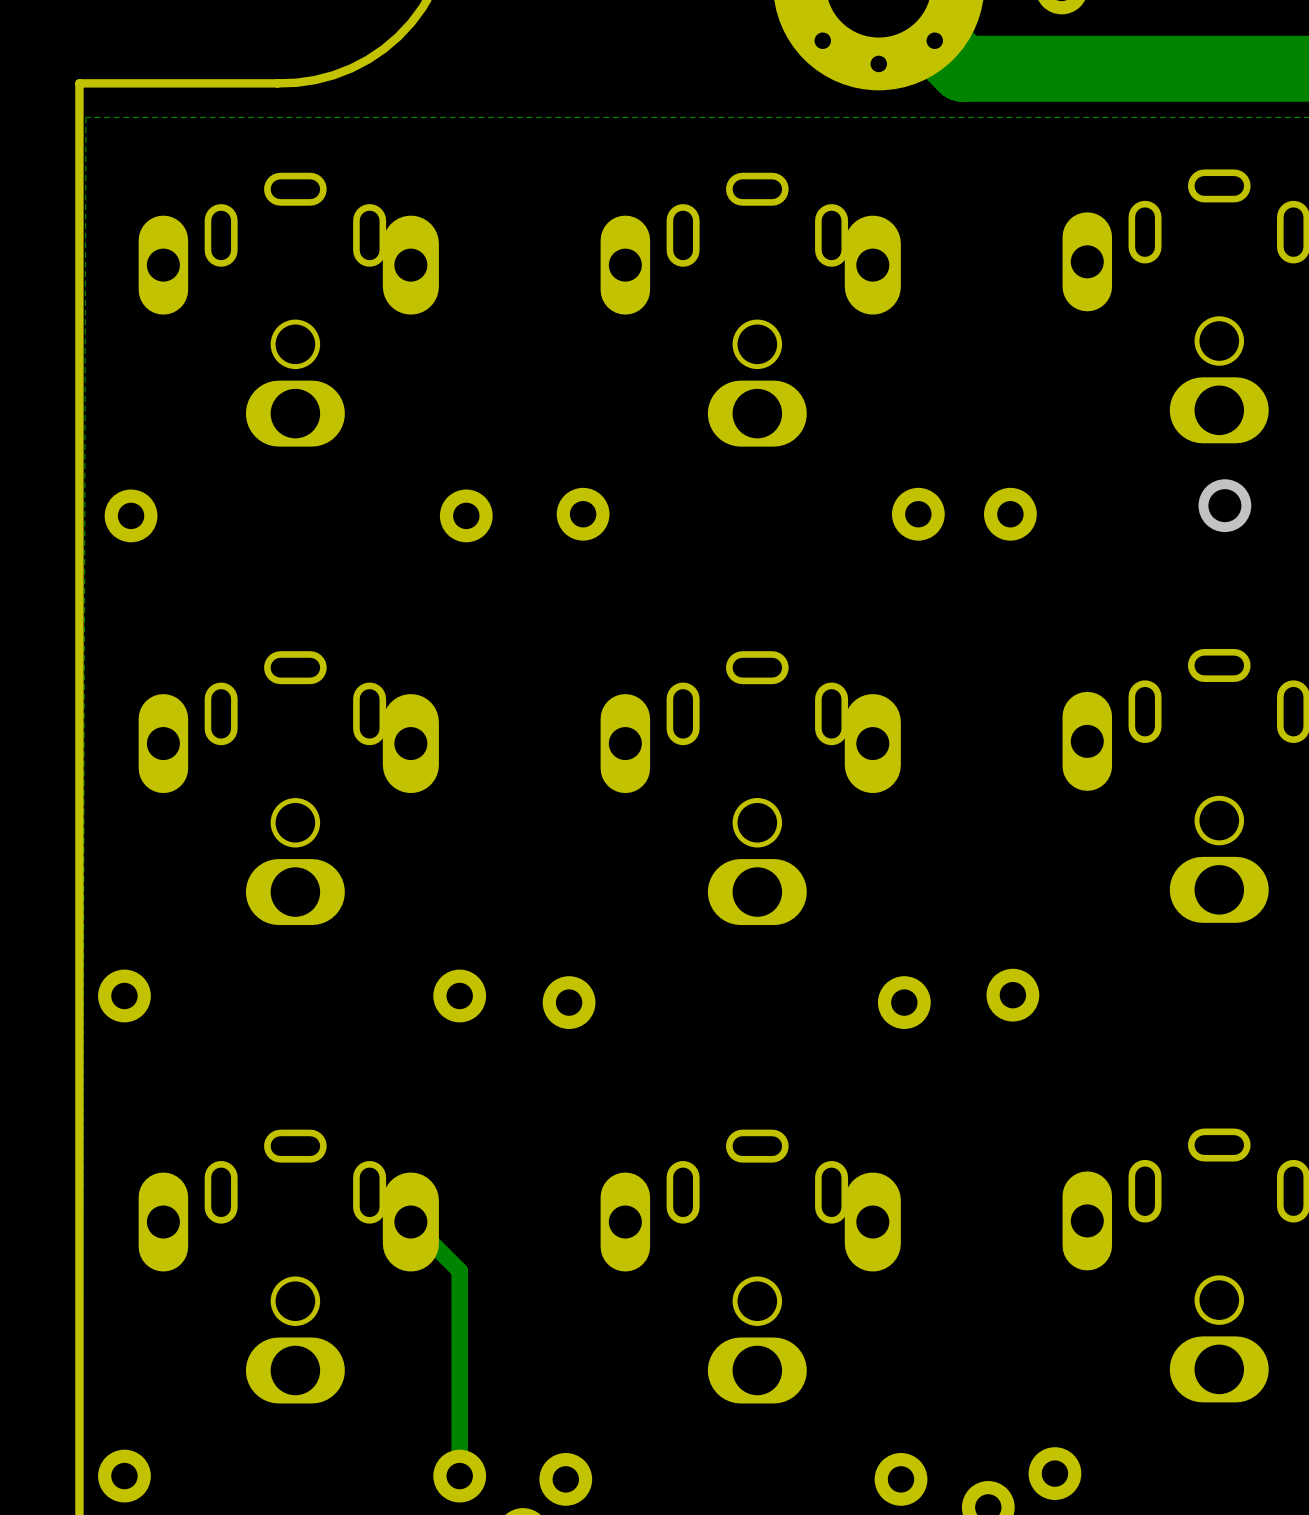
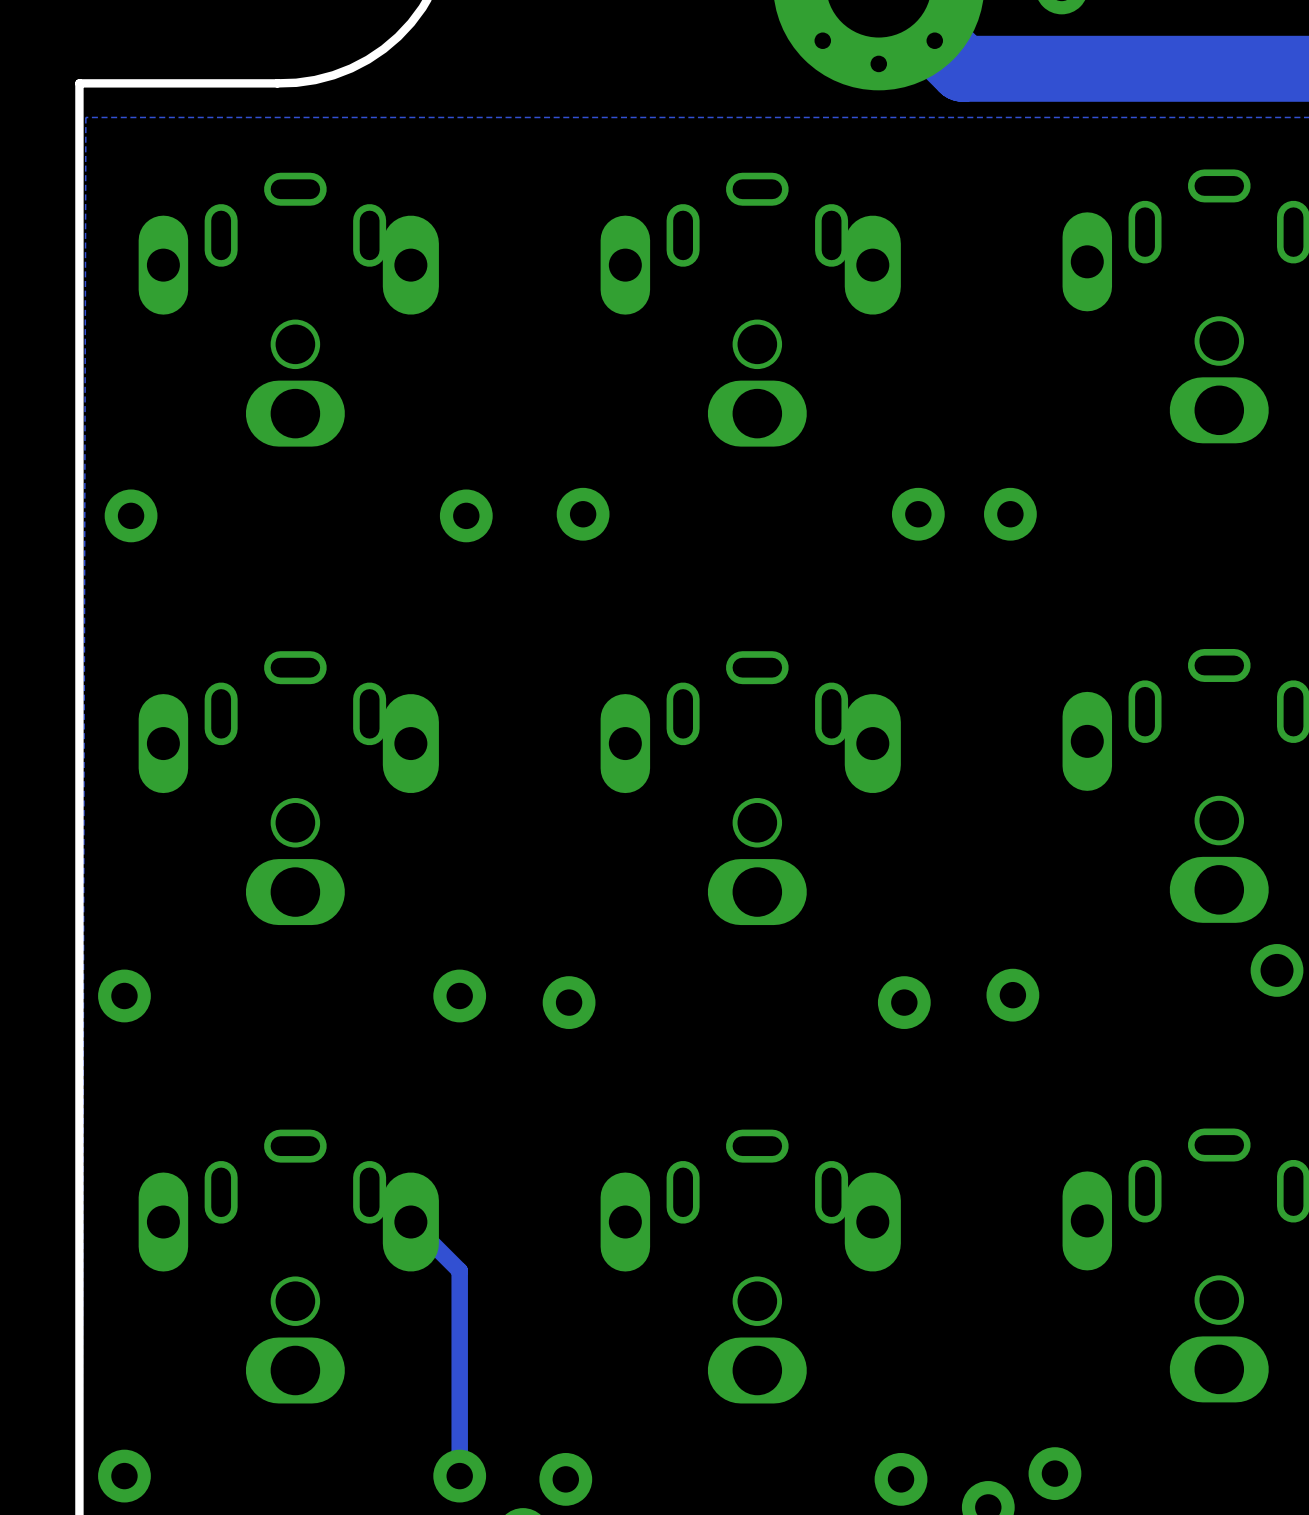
via: (1224, 505) -> none
via: none -> (1277, 970)

